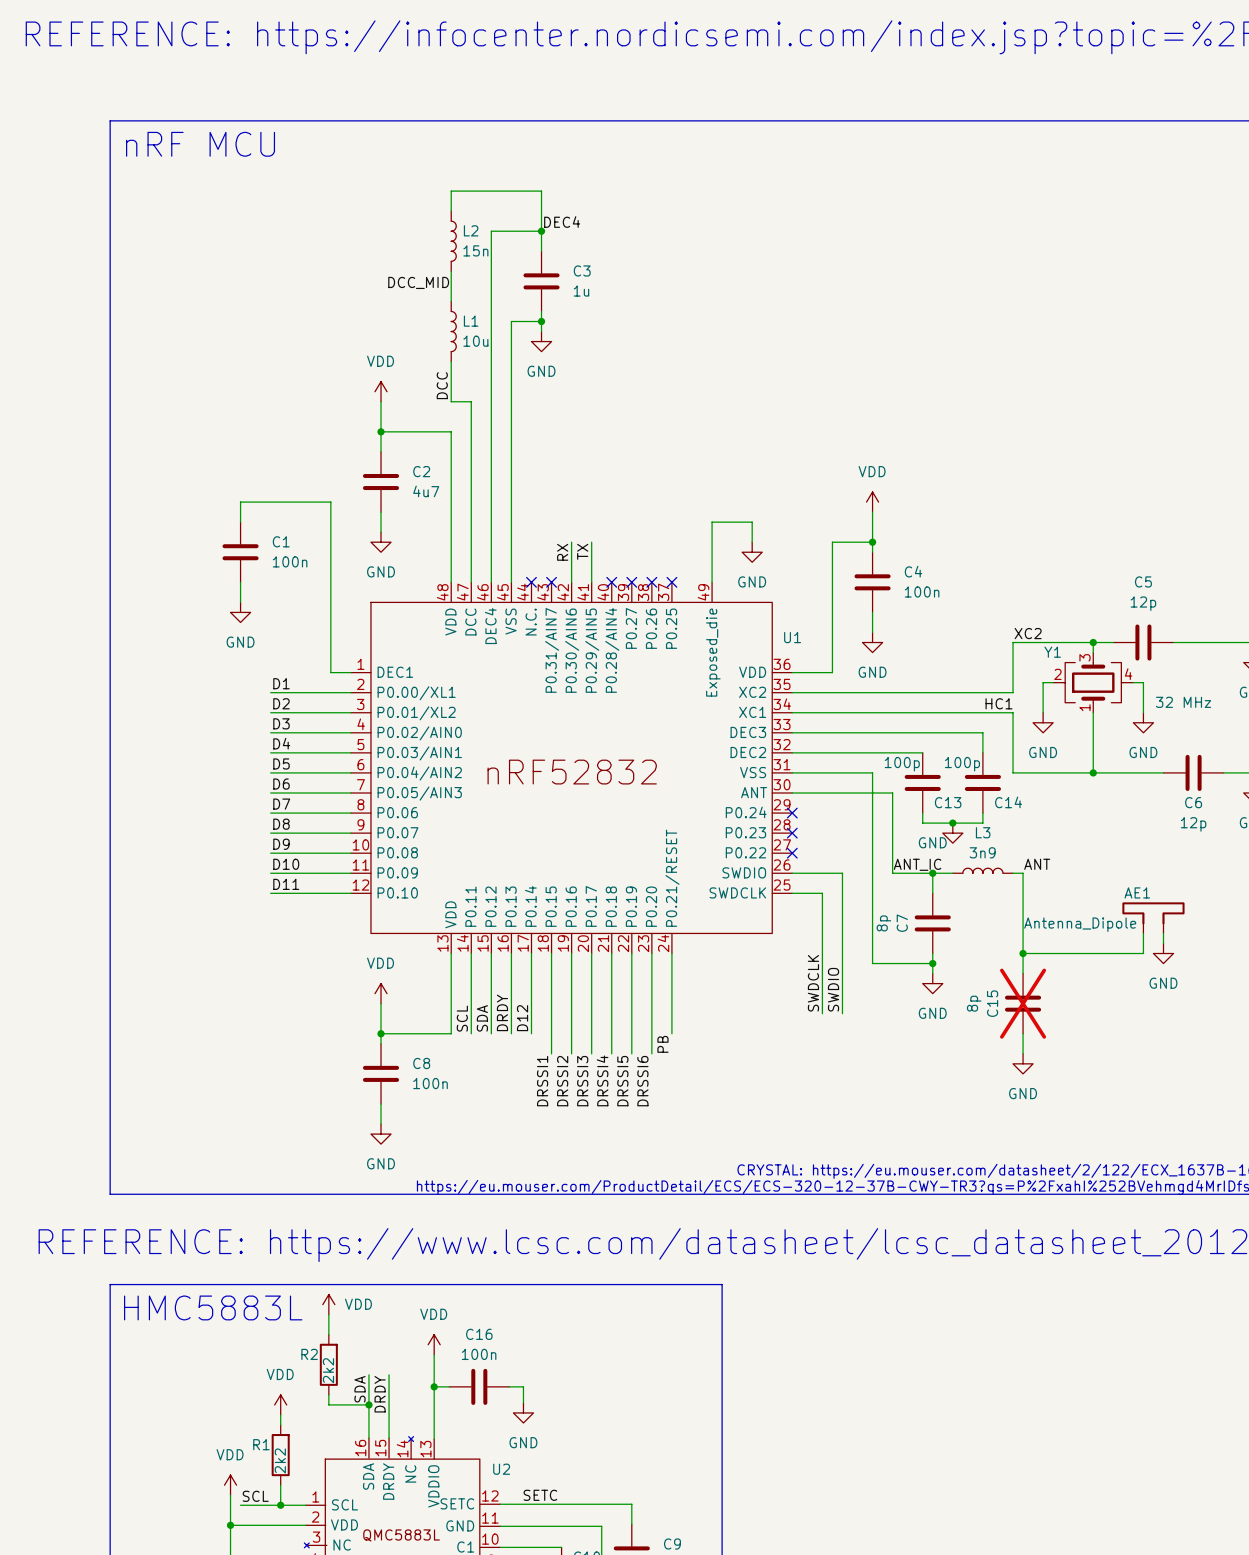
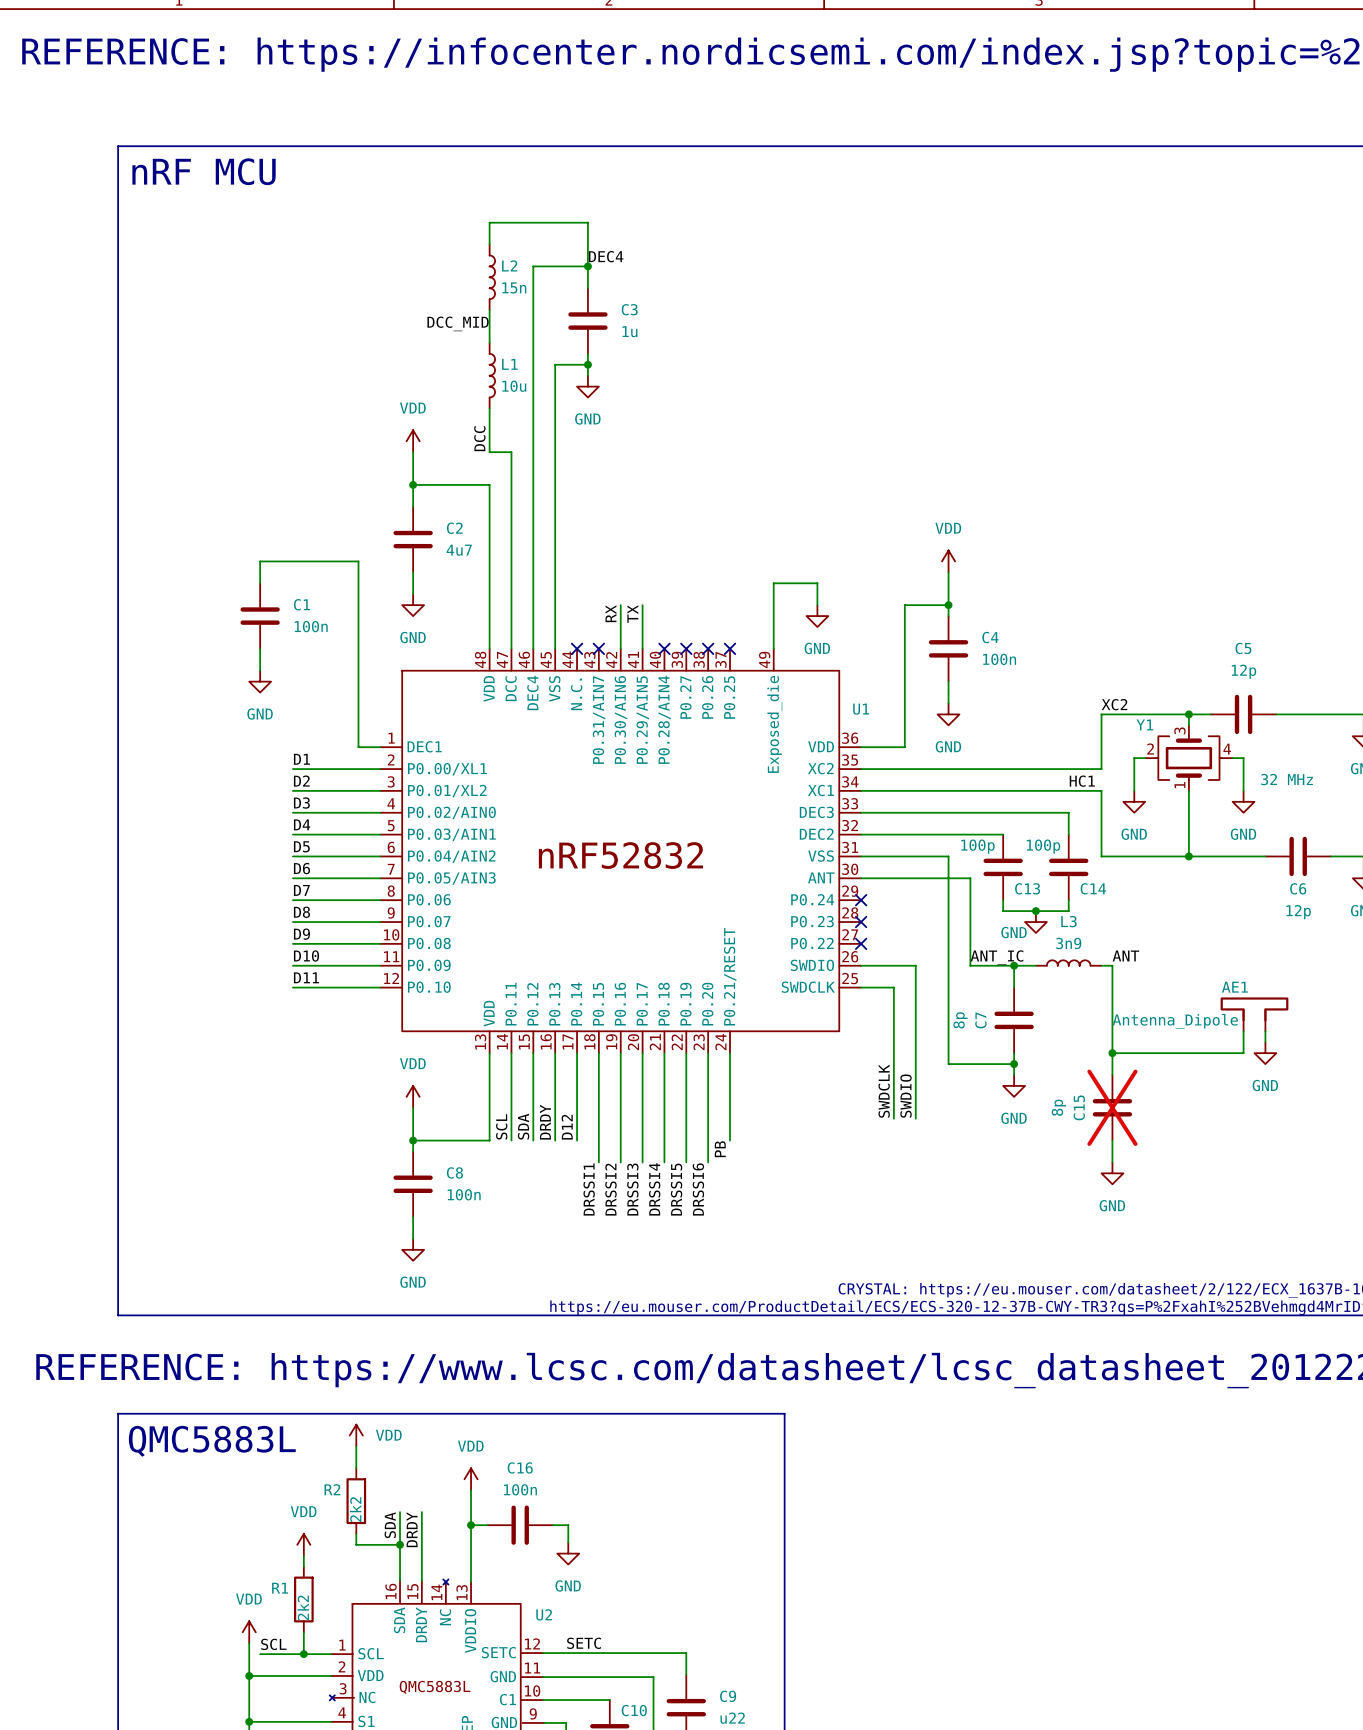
text: HMC5883L (213, 1307) -> QMC5883L (212, 1441)

